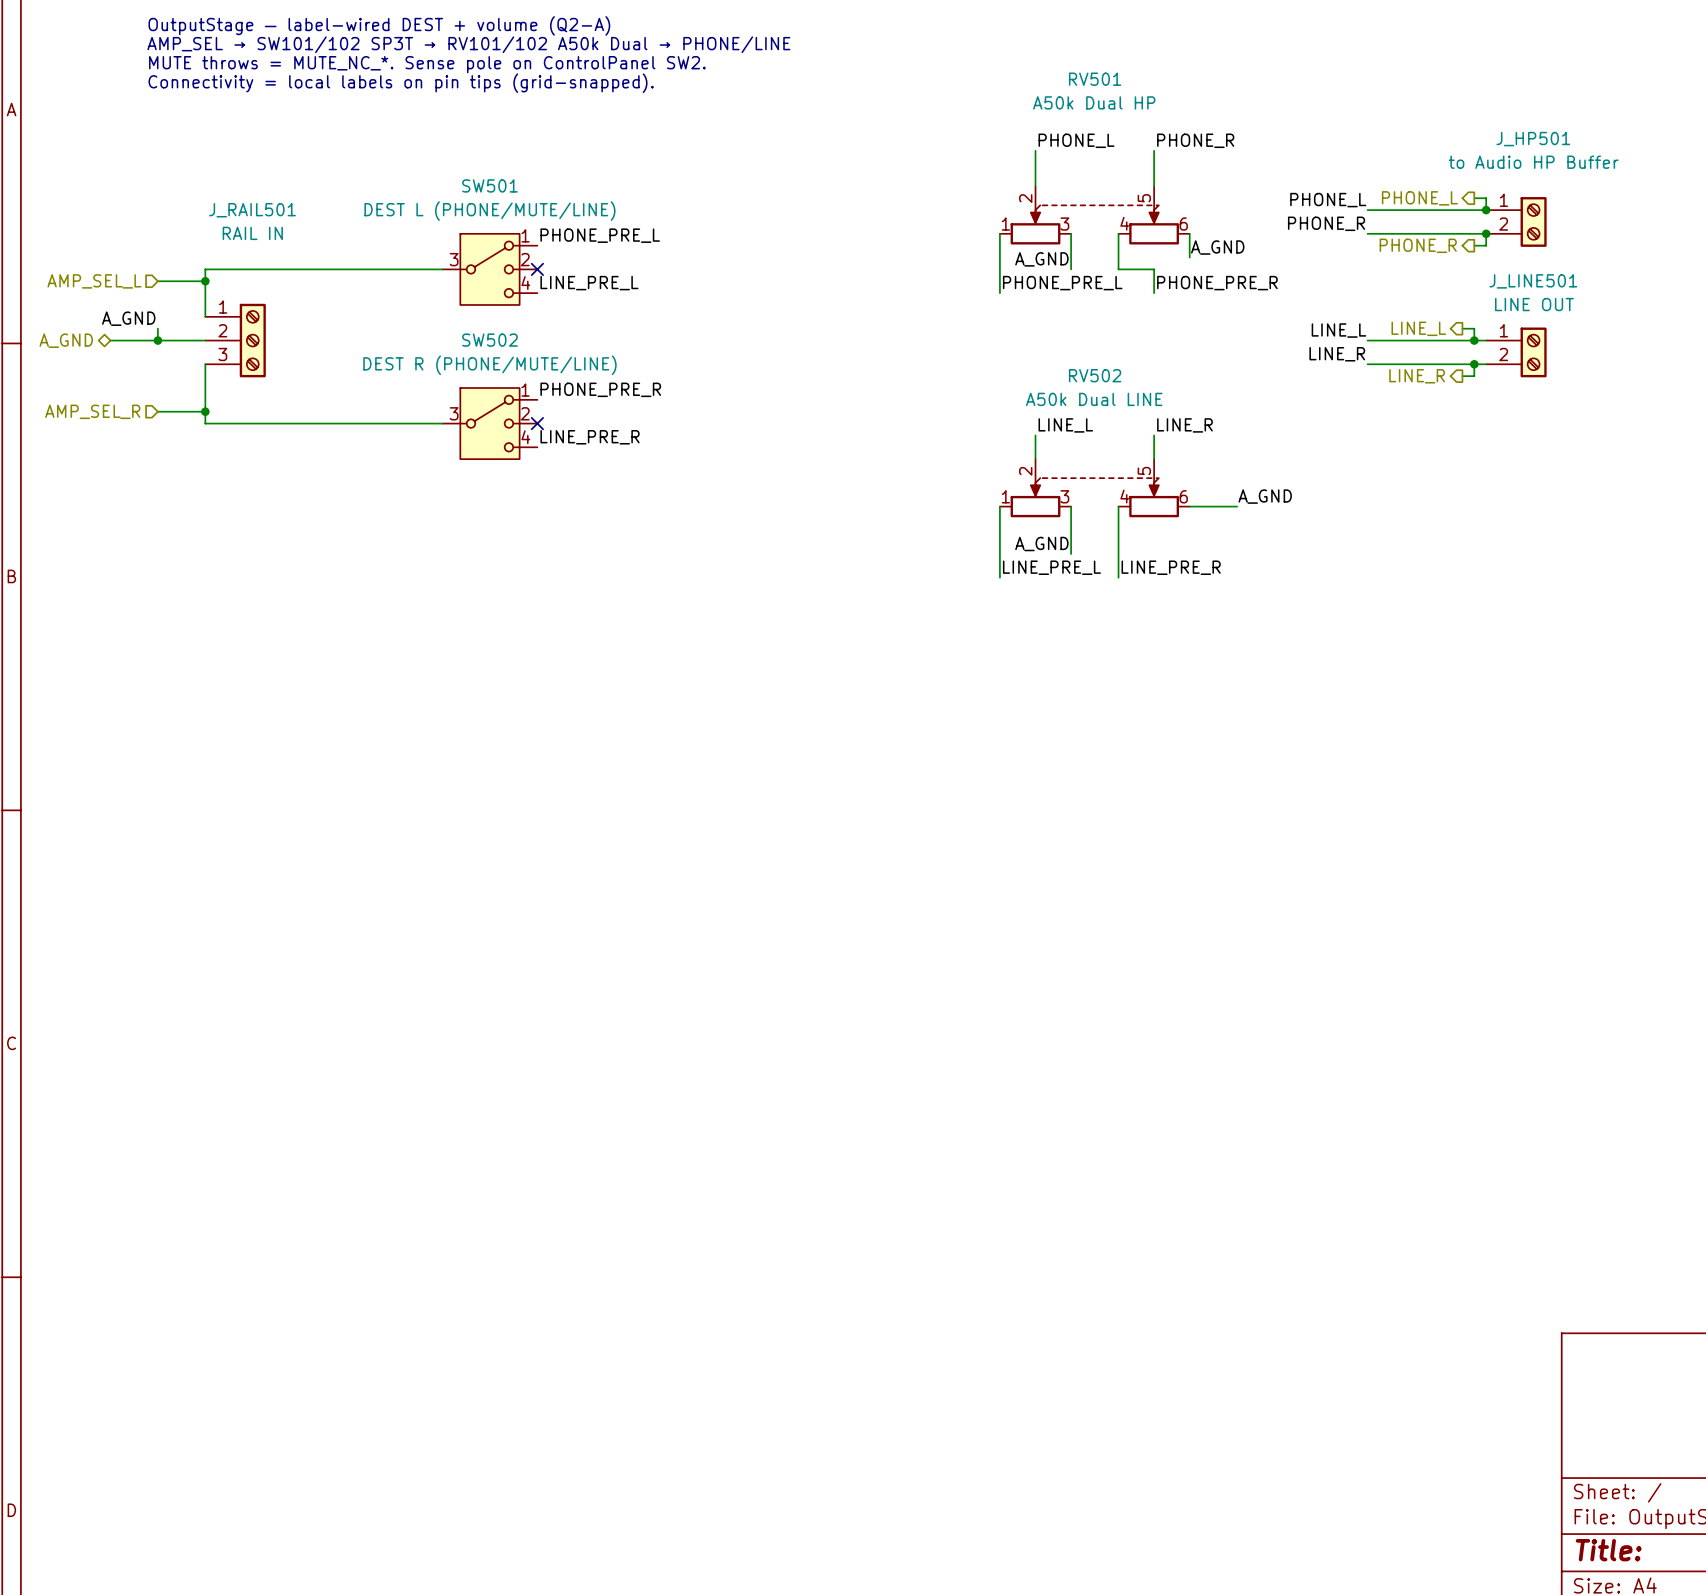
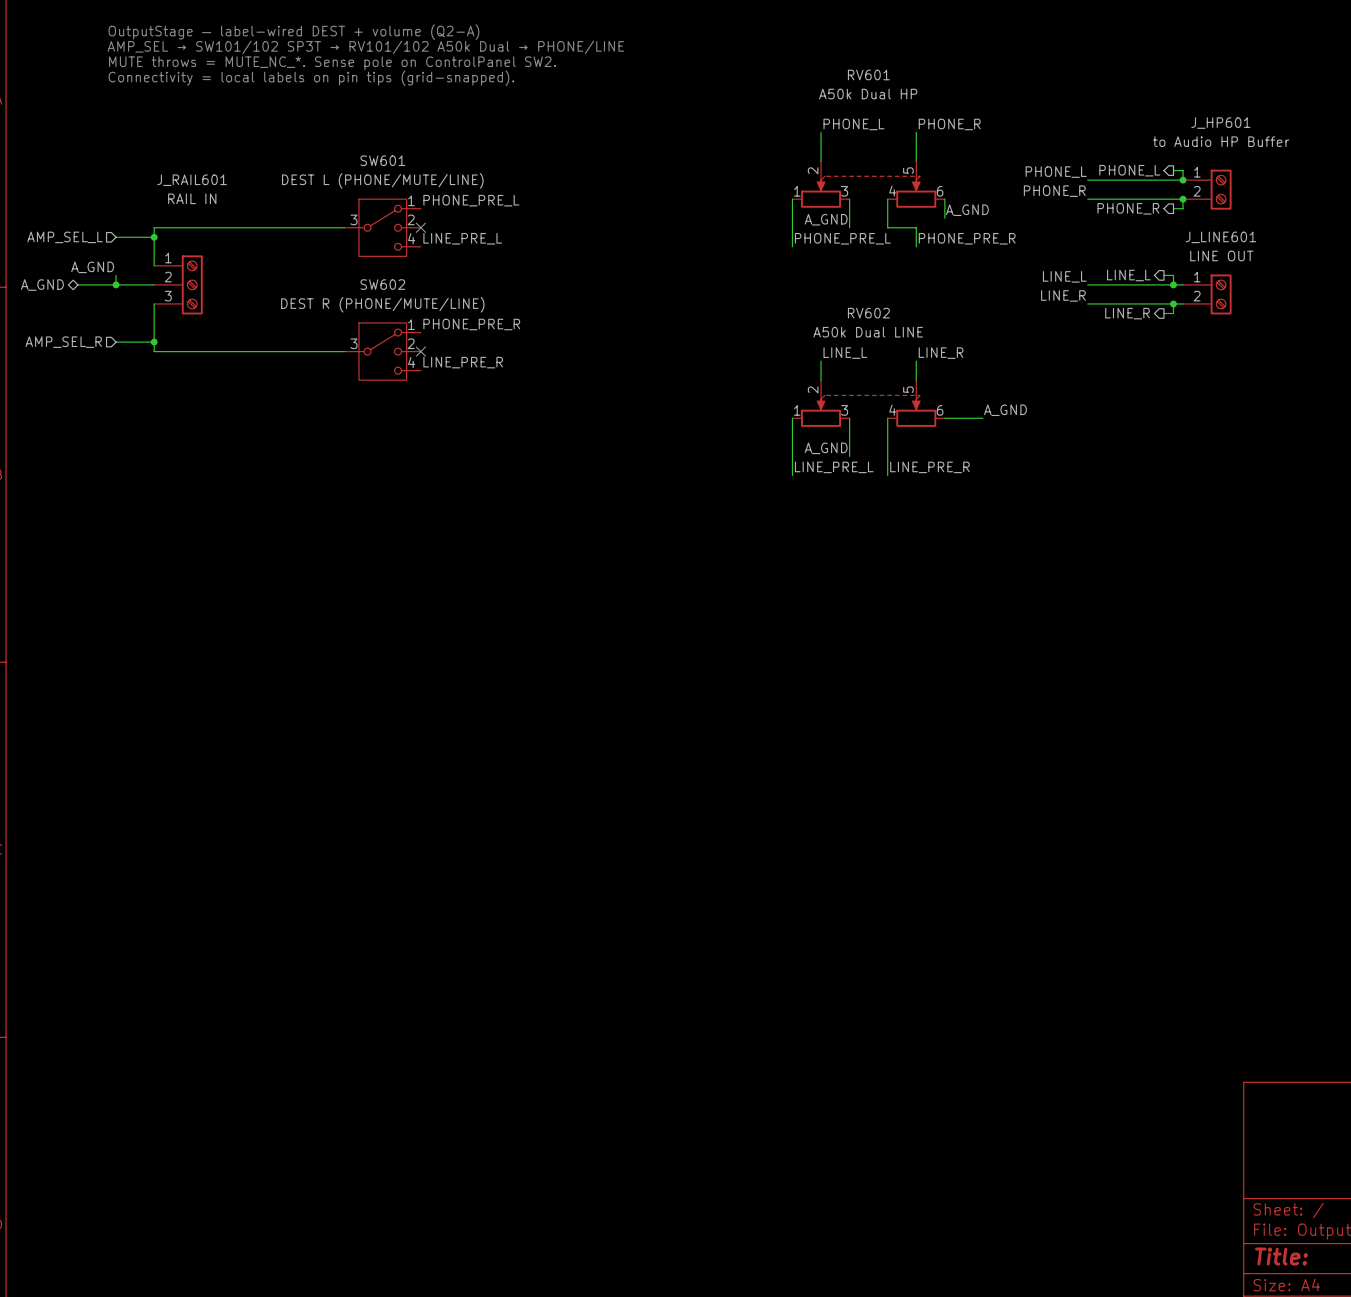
RV501 name: RV501 (1095, 79) -> RV601 (868, 74)
J_HP501 name: J_HP501 (1533, 139) -> J_HP601 (1220, 123)
SW501 name: SW501 (489, 185) -> SW601 (382, 160)
J_RAIL501 name: J_RAIL501 (252, 210) -> J_RAIL601 (192, 180)
J_LINE501 name: J_LINE501 (1533, 281) -> J_LINE601 (1220, 237)
SW502 name: SW502 (489, 340) -> SW602 (382, 284)
RV502 name: RV502 (1095, 375) -> RV602 (868, 313)

